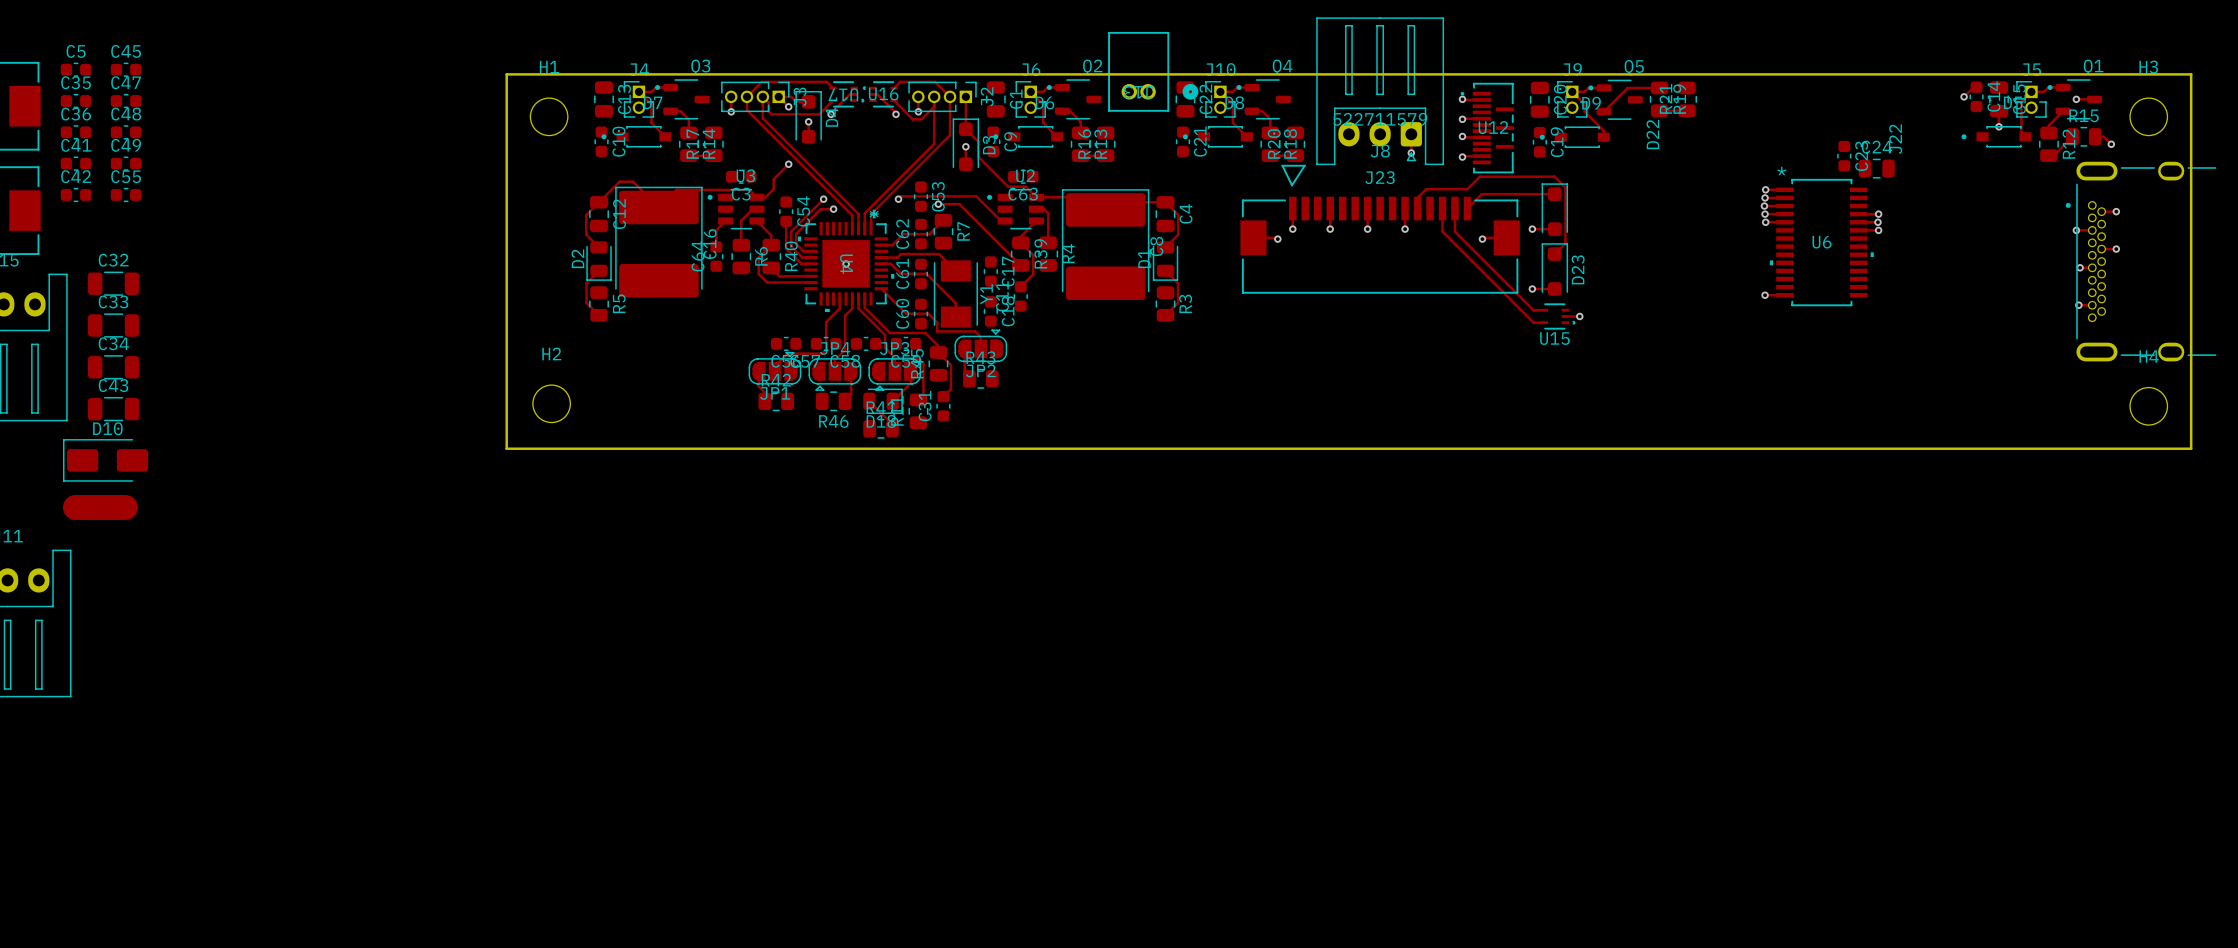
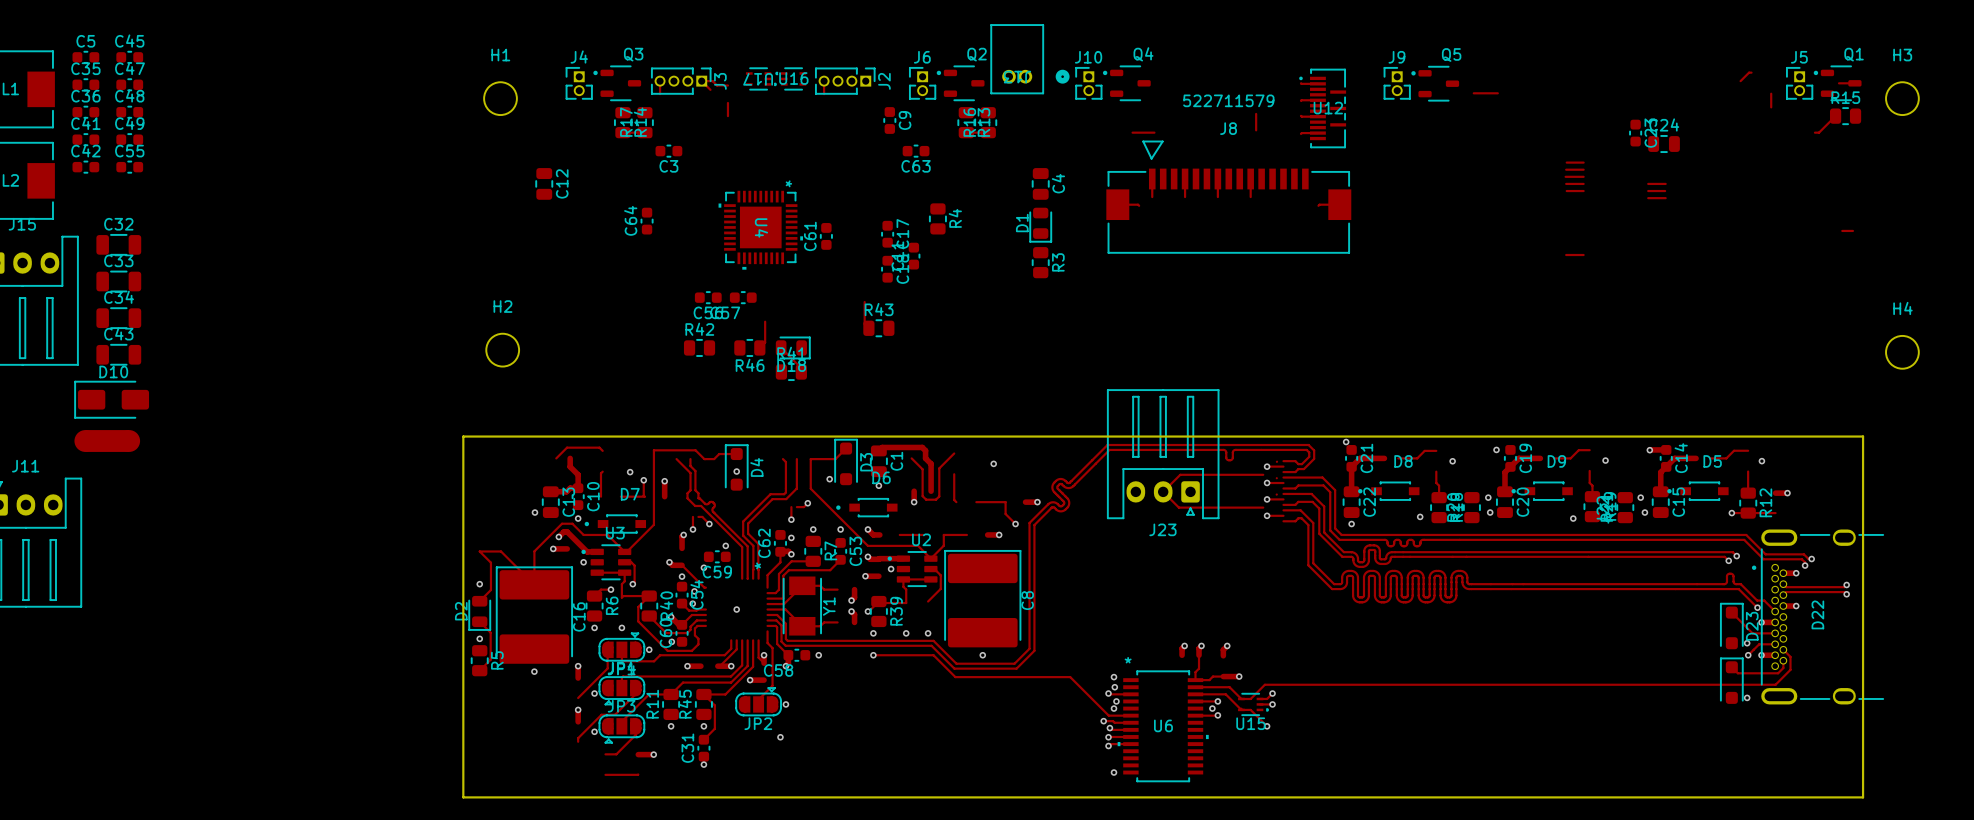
board edge: (506, 74) (2191, 74) (2191, 448) (506, 448) (506, 74) -> none
track: (670, 87) (655, 87) (651, 91) (638, 91) (651, 104) (651, 122) (665, 136) -> none
track: (1062, 87) (1047, 87) (1043, 91) (1030, 91) (1043, 104) (1043, 122) (1057, 136) -> none
track: (1252, 87) (1237, 87) (1232, 91) (1220, 91) (1232, 104) (1232, 122) (1246, 136) -> none
track: (1604, 87) (1588, 87) (1584, 91) (1572, 91) (1584, 104) (1584, 111) (1603, 130) (1603, 137) -> none
track: (1659, 87) (1627, 87) (1604, 111) -> none
track: (2063, 87) (2048, 87) (2043, 91) (2031, 91) (2021, 101) (2021, 132) (2025, 136) -> none
track: (832, 88) (826, 81) (761, 81) (747, 96) (747, 110) (852, 215) (852, 228) -> none
track: (894, 88) (900, 81) (935, 81) (950, 96) (950, 135) (871, 214) (871, 228) -> none
J23 position: (1380, 91) -> (1163, 454)
track: (854, 94) (849, 94) (831, 114) -> none
track: (872, 94) (877, 94) (896, 114) -> none
track: (934, 96) (934, 143) (864, 213) (864, 228) -> none
track: (965, 96) (965, 129) (978, 141) (978, 156) (1008, 186) (1025, 186) (1036, 197) (1092, 197) (1105, 209) (1113, 202) (1165, 202) (1178, 215) (1178, 234) (1165, 247) -> none
via: (1964, 96) -> none
C14 position: (1976, 96) -> (1666, 458)
C13 position: (604, 99) -> (550, 502)
C1 position: (995, 99) -> (878, 461)
C22 position: (1185, 99) -> (1351, 502)
via: (1462, 99) -> none
C20 position: (1539, 99) -> (1504, 502)
R19 position: (1659, 99) -> (1592, 506)
R21 position: (1687, 99) -> (1625, 507)
C15 position: (1999, 99) -> (1660, 502)
via: (2076, 99) -> none
track: (832, 100) (819, 114) (771, 114) (768, 111) (768, 102) (762, 96) (762, 118) (858, 214) (858, 228) -> none
track: (894, 100) (912, 119) (921, 119) (934, 106) -> none
via: (788, 106) -> none
track: (670, 111) (680, 111) (688, 119) (688, 132) -> none
via: (731, 111) -> none
via: (918, 111) -> none
track: (1062, 111) (1070, 111) (1080, 121) (1080, 132) -> none
track: (1252, 111) (1262, 111) (1270, 119) (1270, 132) -> none
track: (2063, 111) (2048, 125) (2048, 132) -> none
via: (831, 114) -> none
via: (896, 114) -> none
D4 position: (808, 117) -> (736, 467)
via: (1462, 119) -> none
via: (808, 121) -> none
via: (1999, 126) -> none
D7 position: (636, 136) -> (615, 524)
D6 position: (1028, 136) -> (866, 507)
D8 position: (1217, 136) -> (1388, 491)
via: (1462, 136) -> none
D5 position: (1996, 136) -> (1697, 491)
track: (2095, 136) (2103, 136) (2111, 144) -> none
D9 position: (1574, 137) -> (1542, 491)
C10 position: (601, 141) -> (578, 496)
C21 position: (1182, 141) -> (1351, 458)
C19 position: (1539, 142) -> (1510, 458)
D3 position: (965, 144) -> (846, 462)
R18 position: (1270, 144) -> (1439, 507)
R20 position: (1295, 144) -> (1471, 507)
R12 position: (2048, 144) -> (1748, 503)
via: (2111, 144) -> none
track: (965, 146) (965, 164) -> none
via: (965, 146) -> none
via: (1411, 153) -> none
via: (1462, 157) -> none
track: (788, 164) (773, 179) (773, 189) (765, 197) (756, 197) (749, 189) (676, 189) (658, 207) (633, 181) (619, 181) (586, 215) (586, 234) (599, 247) -> none
via: (788, 164) -> none
via: (1765, 189) -> none
track: (1554, 194) (1481, 194) (1467, 208) -> none
C53 position: (920, 196) -> (840, 551)
via: (1765, 197) -> none
track: (823, 199) (791, 231) (791, 246) (802, 257) (810, 257) -> none
via: (823, 199) -> none
track: (898, 199) (901, 196) (976, 196) (1000, 221) (1005, 221) -> none
via: (898, 199) -> none
track: (938, 204) (959, 204) (1020, 265) -> none
via: (938, 204) -> none
via: (1764, 206) -> none
track: (1417, 208) (1417, 197) (1426, 189) (1467, 189) (1479, 176) (1554, 176) (1565, 187) (1565, 243) (1554, 254) -> none
track: (1442, 208) (1442, 231) (1533, 322) (1544, 322) -> none
track: (1454, 208) (1454, 231) (1533, 310) (1544, 310) -> none
U3 position: (736, 209) -> (606, 562)
track: (756, 209) (752, 209) (741, 220) (741, 245) -> none
track: (833, 209) (820, 209) (796, 233) (796, 244) (803, 251) (810, 251) -> none
via: (833, 209) -> none
U2 position: (1015, 209) -> (912, 569)
track: (1036, 209) (1043, 209) (1048, 213) (1048, 242) -> none
D22 position: (1554, 209) -> (1731, 680)
C54 position: (786, 211) -> (682, 595)
track: (2101, 211) (2116, 211) -> none
via: (2116, 211) -> none
via: (1765, 214) -> none
via: (1878, 214) -> none
track: (943, 220) (929, 234) (903, 234) (892, 245) (881, 245) -> none
track: (725, 221) (716, 230) (716, 246) -> none
track: (756, 221) (771, 235) (771, 245) (758, 257) (758, 274) (767, 282) (810, 282) -> none
track: (786, 221) (786, 248) (801, 263) (810, 263) -> none
track: (1036, 221) (1020, 236) (1020, 242) (1033, 255) (1033, 274) (1020, 286) -> none
via: (1765, 222) -> none
via: (1877, 222) -> none
via: (1292, 229) -> none
via: (1330, 229) -> none
via: (1367, 229) -> none
via: (1405, 229) -> none
track: (1532, 229) (1554, 229) -> none
via: (1532, 229) -> none
via: (1878, 230) -> none
track: (2076, 230) (2092, 230) -> none
via: (2076, 230) -> none
R7 position: (943, 231) -> (813, 551)
C62 position: (920, 234) -> (780, 543)
via: (1277, 239) -> none
via: (1482, 239) -> none
C16 position: (658, 242) -> (534, 615)
U6 position: (1821, 242) -> (1163, 726)
C8 position: (1105, 244) -> (982, 598)
track: (2101, 249) (2116, 249) -> none
via: (2116, 249) -> none
R39 position: (1020, 254) -> (878, 611)
R6 position: (741, 256) -> (594, 606)
R40 position: (771, 256) -> (649, 606)
track: (881, 257) (897, 257) (900, 254) (939, 254) (955, 270) (955, 268) -> none
D2 position: (599, 261) -> (479, 613)
J22 position: (2141, 261) -> (1817, 616)
track: (881, 263) (890, 263) (900, 273) (926, 273) (955, 303) (955, 317) -> none
via: (846, 264) -> none
track: (771, 267) (779, 276) (810, 276) -> none
via: (2080, 267) -> none
D23 position: (1554, 269) -> (1731, 626)
track: (599, 270) (586, 283) (586, 302) (599, 315) -> none
track: (1165, 270) (1178, 283) (1178, 302) (1165, 315) -> none
track: (881, 288) (906, 313) (928, 313) (937, 322) (937, 331) (975, 331) (980, 337) (980, 348) -> none
track: (1532, 289) (1554, 289) -> none
via: (1532, 289) -> none
Y1 position: (955, 294) -> (802, 606)
via: (1765, 295) -> none
track: (839, 298) (839, 308) (826, 322) (826, 349) (822, 353) (787, 353) (774, 365) (774, 371) -> none
track: (852, 298) (852, 308) (845, 315) (845, 349) (834, 360) (834, 371) -> none
track: (858, 298) (858, 308) (885, 335) (885, 347) (894, 357) (894, 371) -> none
track: (864, 298) (864, 307) (890, 333) (925, 333) (938, 346) (938, 352) (950, 364) (950, 389) (943, 396) -> none
R5 position: (599, 303) -> (479, 660)
track: (2078, 305) (2092, 305) -> (1775, 493) (1787, 493)
via: (2078, 305) -> none
C60 position: (920, 313) -> (682, 633)
U15 position: (1557, 316) -> (1253, 704)
track: (1565, 316) (1579, 316) -> none
via: (1579, 316) -> none
C58 position: (866, 343) -> (796, 655)
C59 position: (905, 343) -> (717, 556)
JP2 position: (980, 345) -> (758, 701)
track: (894, 359) (917, 358) (923, 363) (923, 394) (918, 399) -> none
R45 position: (938, 363) -> (703, 704)
JP1 position: (774, 368) -> (621, 647)
track: (758, 371) (758, 386) (764, 392) (764, 401) -> none
track: (910, 371) (910, 383) (892, 401) -> none
JP4 position: (834, 374) -> (621, 690)
JP3 position: (894, 374) -> (621, 729)
C31 position: (943, 406) -> (703, 748)
R11 position: (918, 411) -> (671, 704)
board edge: none -> (463, 436) (1863, 436) (1863, 797) (463, 797) (463, 436)
via: none -> (1346, 442)
track: none -> (846, 448) (835, 459) (810, 459) (810, 488) (867, 545) (918, 545) (930, 558) (943, 545) (943, 534) (966, 534)
via: none -> (1496, 449)
track: none -> (1589, 450) (1578, 450) (1570, 458) (1554, 458)
via: none -> (1649, 450)
track: none -> (1666, 449) (1649, 450)
track: none -> (602, 450) (599, 447) (567, 447) (556, 458)
track: none -> (878, 450) (882, 447) (922, 447) (925, 450) (925, 458) (931, 463) (931, 491)
track: none -> (1436, 450) (1424, 450) (1417, 458) (1398, 458)
track: none -> (1748, 450) (1734, 450) (1726, 458) (1709, 458)
track: none -> (954, 453) (939, 468) (939, 496) (936, 499) (926, 499) (922, 496) (922, 469) (911, 458)
track: none -> (736, 454) (719, 454) (714, 459) (704, 459) (695, 450) (653, 450) (653, 524) (626, 551) (607, 534) (583, 534) (572, 523) (562, 523) (534, 551) (534, 584) (501, 551) (479, 551) (490, 562) (490, 590) (479, 601)
track: none -> (570, 458) (570, 466) (578, 474) (578, 488) (570, 488) (566, 491) (550, 491)
track: none -> (1384, 458) (1360, 458) (1351, 466) (1351, 491)
track: none -> (1540, 458) (1518, 458) (1504, 472) (1504, 491)
track: none -> (1696, 458) (1674, 458) (1660, 472) (1660, 491)
track: none -> (676, 459) (690, 473) (690, 490) (687, 493) (687, 498) (695, 505) (701, 505) (742, 547) (742, 578)
track: none -> (690, 459) (690, 466) (695, 470) (695, 490) (698, 493) (698, 498) (705, 504) (713, 502) (714, 505) (712, 511) (747, 546) (747, 578)
track: none -> (782, 459) (785, 462) (785, 492) (784, 494) (770, 494) (743, 521) (743, 535) (753, 545) (753, 578)
track: none -> (796, 459) (796, 488) (786, 499) (772, 499) (748, 523) (748, 533) (758, 543) (758, 578)
via: none -> (1605, 460)
track: none -> (1283, 461) (1295, 461) (1301, 464) (1309, 456) (1309, 452) (1306, 449) (1235, 449) (1232, 451) (1232, 458) (1228, 460) (1223, 449) (1109, 449) (1072, 486) (1067, 488) (1059, 484) (1057, 488) (1068, 499) (1068, 506) (1060, 511) (1052, 507) (1034, 525) (1034, 650) (1016, 668) (954, 668) (931, 645) (785, 645) (781, 641) (781, 625) (776, 620) (767, 620)
via: none -> (1452, 461)
via: none -> (1761, 461)
via: none -> (993, 463)
track: none -> (1267, 466) (1283, 466)
via: none -> (1267, 466)
track: none -> (1589, 470) (1592, 496)
track: none -> (602, 471) (600, 473) (600, 496)
via: none -> (630, 472)
via: none -> (736, 471)
track: none -> (1283, 472) (1295, 472) (1298, 469) (1303, 469) (1314, 458) (1314, 450) (1308, 445) (1107, 445) (1069, 482) (1062, 479) (1056, 480) (1052, 484) (1052, 489) (1064, 503) (1060, 506) (1055, 502) (1050, 502) (1029, 523) (1029, 648) (1014, 663) (956, 663) (933, 640) (787, 640) (785, 639) (785, 623) (777, 614) (767, 614)
track: none -> (1436, 471) (1439, 497)
track: none -> (1748, 471) (1748, 493)
track: none -> (954, 474) (954, 499) (956, 502)
track: none -> (1263, 474) (1180, 474) (1163, 491)
track: none -> (1283, 477) (1322, 477) (1335, 490) (1335, 528) (1341, 534) (1746, 534) (1765, 554) (1803, 554) (1808, 559) (1811, 559)
via: none -> (829, 479)
track: none -> (643, 480) (644, 496) (620, 496)
via: none -> (643, 480)
track: none -> (664, 481) (664, 496)
via: none -> (664, 481)
track: none -> (1267, 483) (1283, 483)
via: none -> (1267, 482)
via: none -> (878, 485)
track: none -> (1283, 488) (1295, 488) (1298, 485) (1323, 485) (1330, 492) (1330, 530) (1339, 539) (1385, 539) (1390, 546) (1393, 545) (1395, 540) (1398, 539) (1403, 546) (1406, 545) (1409, 539) (1413, 540) (1416, 546) (1419, 545) (1423, 539) (1744, 539) (1763, 559) (1801, 559) (1805, 565)
track: none -> (914, 491) (914, 502)
track: none -> (1163, 491) (1178, 507) (1263, 507)
via: none -> (1787, 493)
track: none -> (1283, 493) (1311, 493) (1324, 506) (1324, 532) (1343, 552) (1351, 552)
via: none -> (1488, 497)
via: none -> (1640, 497)
track: none -> (1267, 499) (1283, 499)
via: none -> (1267, 499)
via: none -> (914, 502)
track: none -> (976, 502) (1005, 502) (1005, 514) (1015, 524)
track: none -> (1025, 502) (1037, 502)
via: none -> (1037, 502)
track: none -> (807, 503) (803, 507) (796, 507)
via: none -> (807, 503)
track: none -> (1283, 504) (1312, 501) (1319, 508) (1319, 533) (1342, 556) (1352, 557) (1354, 563) (1359, 566) (1367, 563) (1370, 549) (1374, 550) (1375, 560) (1381, 563) (1388, 563) (1392, 556) (1724, 556) (1728, 560)
track: none -> (791, 507) (791, 519)
track: none -> (1283, 510) (1300, 510) (1313, 523) (1313, 563) (1334, 584) (1341, 583) (1342, 575) (1345, 571) (1355, 572) (1357, 576) (1359, 597) (1363, 596) (1364, 576) (1370, 570) (1375, 571) (1379, 574) (1379, 595) (1381, 597) (1385, 595) (1386, 575) (1391, 570) (1397, 571) (1401, 574) (1401, 595) (1403, 597) (1407, 595) (1408, 575) (1413, 570) (1419, 571) (1422, 574) (1423, 595) (1425, 597) (1429, 595) (1429, 575) (1435, 570) (1441, 571) (1444, 574) (1445, 595) (1447, 597) (1451, 595) (1451, 575) (1457, 570) (1465, 573) (1469, 584) (1724, 584) (1726, 582) (1727, 575) (1730, 573) (1733, 575) (1734, 583) (1740, 584) (1757, 600) (1764, 600) (1775, 611)
via: none -> (534, 512)
via: none -> (1490, 512)
via: none -> (1644, 512)
track: none -> (1731, 513) (1775, 513)
via: none -> (1731, 513)
track: none -> (1267, 515) (1283, 515)
via: none -> (1267, 515)
track: none -> (692, 516) (692, 529)
track: none -> (698, 516) (702, 516) (709, 524)
via: none -> (1420, 516)
via: none -> (578, 518)
via: none -> (1573, 518)
via: none -> (791, 519)
track: none -> (1283, 521) (1295, 521) (1301, 518) (1308, 525) (1308, 565) (1332, 589) (1343, 588) (1346, 584) (1347, 576) (1352, 576) (1353, 597) (1358, 602) (1364, 601) (1368, 598) (1368, 577) (1370, 575) (1374, 577) (1375, 597) (1379, 601) (1386, 601) (1390, 598) (1390, 577) (1392, 575) (1396, 577) (1396, 596) (1400, 601) (1407, 602) (1411, 599) (1412, 577) (1416, 575) (1418, 577) (1419, 598) (1423, 602) (1430, 601) (1434, 596) (1434, 577) (1438, 575) (1440, 577) (1441, 598) (1445, 601) (1451, 602) (1456, 597) (1456, 577) (1460, 575) (1463, 585) (1469, 589) (1738, 589) (1755, 606)
via: none -> (709, 524)
via: none -> (1015, 524)
via: none -> (1351, 524)
via: none -> (692, 529)
via: none -> (813, 529)
via: none -> (840, 529)
track: none -> (867, 529) (873, 534) (879, 534)
via: none -> (867, 529)
track: none -> (683, 534) (682, 548)
via: none -> (683, 534)
track: none -> (899, 534) (923, 534)
track: none -> (987, 534) (999, 534)
via: none -> (999, 534)
track: none -> (558, 536) (563, 531) (567, 531) (587, 551) (597, 551)
via: none -> (558, 536)
via: none -> (791, 537)
via: none -> (725, 545)
track: none -> (553, 548) (567, 548)
via: none -> (553, 548)
track: none -> (1351, 552) (1356, 554) (1360, 562) (1363, 561) (1364, 548) (1370, 545) (1378, 547) (1381, 559) (1385, 559) (1387, 553) (1392, 552) (1732, 552) (1736, 556)
track: none -> (791, 554) (788, 551) (780, 551) (780, 562) (767, 575) (767, 587)
via: none -> (791, 554)
via: none -> (1736, 556)
track: none -> (867, 556) (870, 559) (903, 558)
via: none -> (867, 556)
via: none -> (1811, 559)
track: none -> (840, 559) (830, 570) (788, 570) (783, 575) (783, 598) (767, 598)
track: none -> (813, 561) (791, 561) (778, 573) (778, 589) (775, 593) (767, 593)
via: none -> (1728, 560)
via: none -> (583, 562)
track: none -> (624, 562) (631, 562) (634, 565) (634, 582) (632, 584)
track: none -> (669, 562) (672, 565) (682, 565) (705, 587)
via: none -> (669, 562)
via: none -> (1805, 565)
text: none -> * (757, 565)
via: none -> (703, 567)
via: none -> (891, 569)
track: none -> (930, 569) (934, 569) (940, 575) (940, 588) (928, 601)
track: none -> (597, 572) (624, 572) (621, 597) (649, 596) (638, 607) (638, 621) (667, 650) (691, 650) (698, 644) (694, 628) (697, 625) (705, 625)
track: none -> (1783, 573) (1796, 573)
via: none -> (1796, 573)
track: none -> (865, 576) (878, 576)
via: none -> (865, 576)
via: none -> (682, 576)
track: none -> (930, 579) (903, 579) (903, 586) (906, 589) (906, 603) (878, 601) (867, 611)
via: none -> (479, 584)
via: none -> (632, 584)
track: none -> (1783, 584) (1786, 587) (1844, 587) (1846, 584)
via: none -> (1846, 584)
track: none -> (610, 589) (600, 589) (594, 596)
via: none -> (610, 589)
track: none -> (837, 589) (824, 589) (820, 585) (802, 585) (784, 604) (767, 604)
track: none -> (854, 589) (854, 597) (851, 600)
via: none -> (694, 591)
track: none -> (1846, 594) (1844, 592) (1786, 592) (1783, 595)
via: none -> (1846, 594)
via: none -> (851, 600)
track: none -> (682, 603) (689, 610) (705, 609)
via: none -> (692, 603)
track: none -> (1783, 606) (1796, 606)
via: none -> (1796, 606)
via: none -> (1757, 607)
via: none -> (736, 609)
track: none -> (767, 609) (785, 609) (802, 626) (820, 626) (824, 622) (837, 622)
track: none -> (851, 611) (854, 614) (854, 622)
via: none -> (851, 611)
via: none -> (867, 611)
track: none -> (1731, 612) (1752, 633) (1775, 633)
track: none -> (705, 614) (691, 614) (682, 624) (679, 624) (671, 616)
track: none -> (649, 616) (666, 633) (687, 633) (696, 620) (705, 620)
via: none -> (671, 616)
track: none -> (479, 621) (490, 632) (490, 659) (479, 670)
track: none -> (1761, 622) (1775, 622)
via: none -> (1761, 622)
track: none -> (767, 625) (777, 627) (777, 644) (788, 655) (788, 663) (785, 666)
via: none -> (594, 627)
via: none -> (621, 627)
track: none -> (767, 631) (767, 643) (772, 648) (772, 685) (758, 699) (758, 704)
via: none -> (873, 633)
via: none -> (906, 633)
via: none -> (928, 633)
via: none -> (479, 638)
track: none -> (731, 640) (731, 648) (724, 655) (660, 655) (654, 661) (623, 661) (621, 649)
track: none -> (736, 640) (736, 649) (717, 666) (731, 666)
track: none -> (742, 640) (742, 665) (730, 676) (623, 676) (621, 688)
track: none -> (747, 640) (747, 666) (731, 682) (682, 682) (671, 694) (649, 694) (621, 721) (621, 726)
track: none -> (753, 640) (753, 666) (725, 694) (703, 694) (714, 705) (714, 728) (703, 739)
track: none -> (758, 640) (758, 657) (764, 663) (764, 655)
via: none -> (671, 641)
via: none -> (1747, 643)
track: none -> (1775, 644) (1759, 644) (1748, 655)
track: none -> (1184, 645) (1182, 648) (1182, 655)
via: none -> (1184, 645)
track: none -> (1201, 645) (1199, 648) (1199, 668) (1195, 672) (1195, 680) (1209, 680) (1212, 676) (1239, 676)
via: none -> (1201, 645)
track: none -> (1227, 645) (1223, 649) (1223, 655)
via: none -> (1227, 645)
track: none -> (607, 649) (607, 668) (578, 698)
via: none -> (649, 649)
track: none -> (1783, 649) (1790, 656) (1790, 669) (1775, 684) (1264, 684) (1250, 698) (1241, 698) (1229, 687) (1195, 687)
via: none -> (764, 655)
via: none -> (818, 655)
track: none -> (873, 655) (933, 655) (955, 677) (1070, 677) (1108, 715) (1130, 715)
via: none -> (873, 655)
via: none -> (982, 655)
via: none -> (1748, 655)
track: none -> (1761, 655) (1775, 655)
via: none -> (1761, 655)
track: none -> (1783, 660) (1783, 668) (1778, 673) (1737, 673) (1731, 667)
track: none -> (578, 666) (578, 678)
via: none -> (578, 666)
track: none -> (687, 666) (700, 666)
via: none -> (687, 666)
via: none -> (731, 666)
via: none -> (785, 666)
via: none -> (534, 671)
via: none -> (1113, 677)
via: none -> (1239, 676)
track: none -> (750, 680) (764, 680)
via: none -> (750, 680)
via: none -> (1114, 687)
track: none -> (636, 688) (636, 693) (615, 714) (601, 714) (578, 738) (578, 741)
via: none -> (594, 693)
track: none -> (1108, 693) (1130, 694)
via: none -> (1108, 693)
track: none -> (1272, 693) (1267, 698) (1259, 698)
via: none -> (1272, 693)
track: none -> (1195, 694) (1225, 694) (1241, 709)
via: none -> (1747, 697)
via: none -> (1116, 701)
track: none -> (1217, 701) (1195, 701)
via: none -> (1217, 701)
via: none -> (785, 704)
track: none -> (1259, 704) (1272, 704)
via: none -> (1272, 704)
via: none -> (1113, 708)
via: none -> (1212, 708)
track: none -> (578, 709) (578, 721)
via: none -> (578, 709)
track: none -> (1241, 709) (1250, 709) (1267, 726)
track: none -> (1217, 715) (1195, 715)
via: none -> (1217, 715)
track: none -> (1103, 721) (1130, 722)
via: none -> (1103, 721)
track: none -> (636, 726) (636, 734) (616, 754) (605, 754)
via: none -> (671, 726)
via: none -> (703, 726)
via: none -> (1267, 726)
track: none -> (1109, 728) (1111, 729) (1130, 729)
via: none -> (1109, 728)
via: none -> (594, 731)
via: none -> (780, 737)
via: none -> (1108, 737)
track: none -> (1130, 736) (1108, 737)
track: none -> (1130, 744) (1110, 744) (1108, 746)
via: none -> (1108, 746)
track: none -> (638, 754) (653, 754)
via: none -> (653, 754)
via: none -> (703, 764)
via: none -> (1113, 772)
track: none -> (638, 774) (605, 774)

